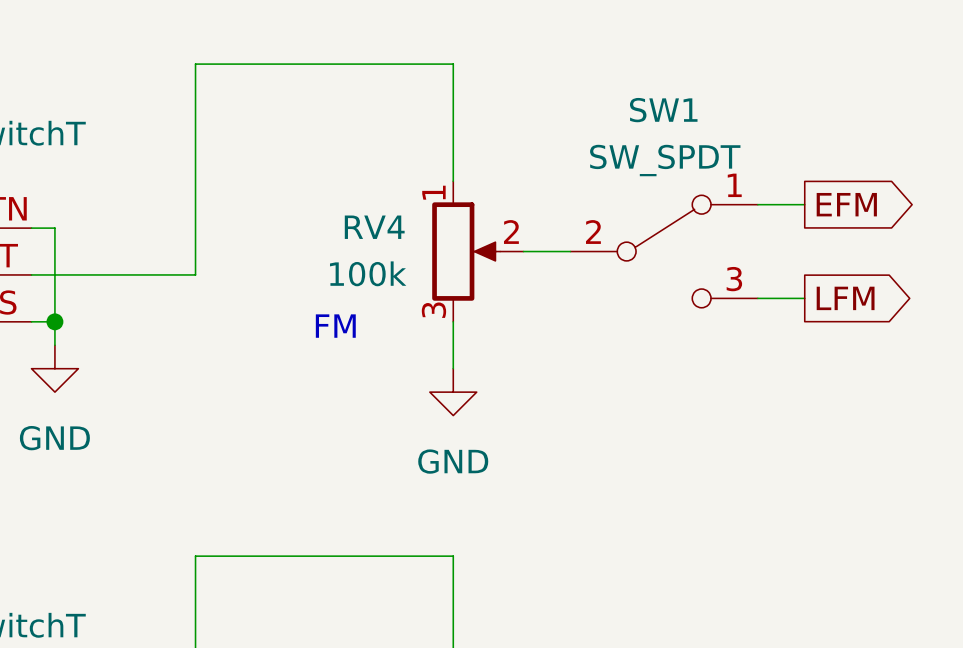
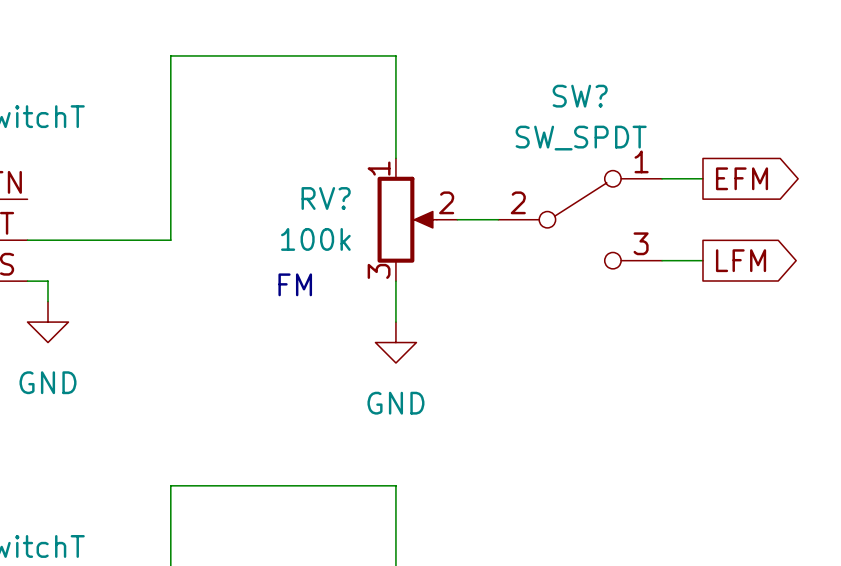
SW1 name: SW1 (663, 110) -> SW? (580, 96)
RV4 name: RV4 (374, 227) -> RV? (326, 198)
wire: (31, 228) (54, 228) (54, 321) -> none
junction: (54, 321) -> none

